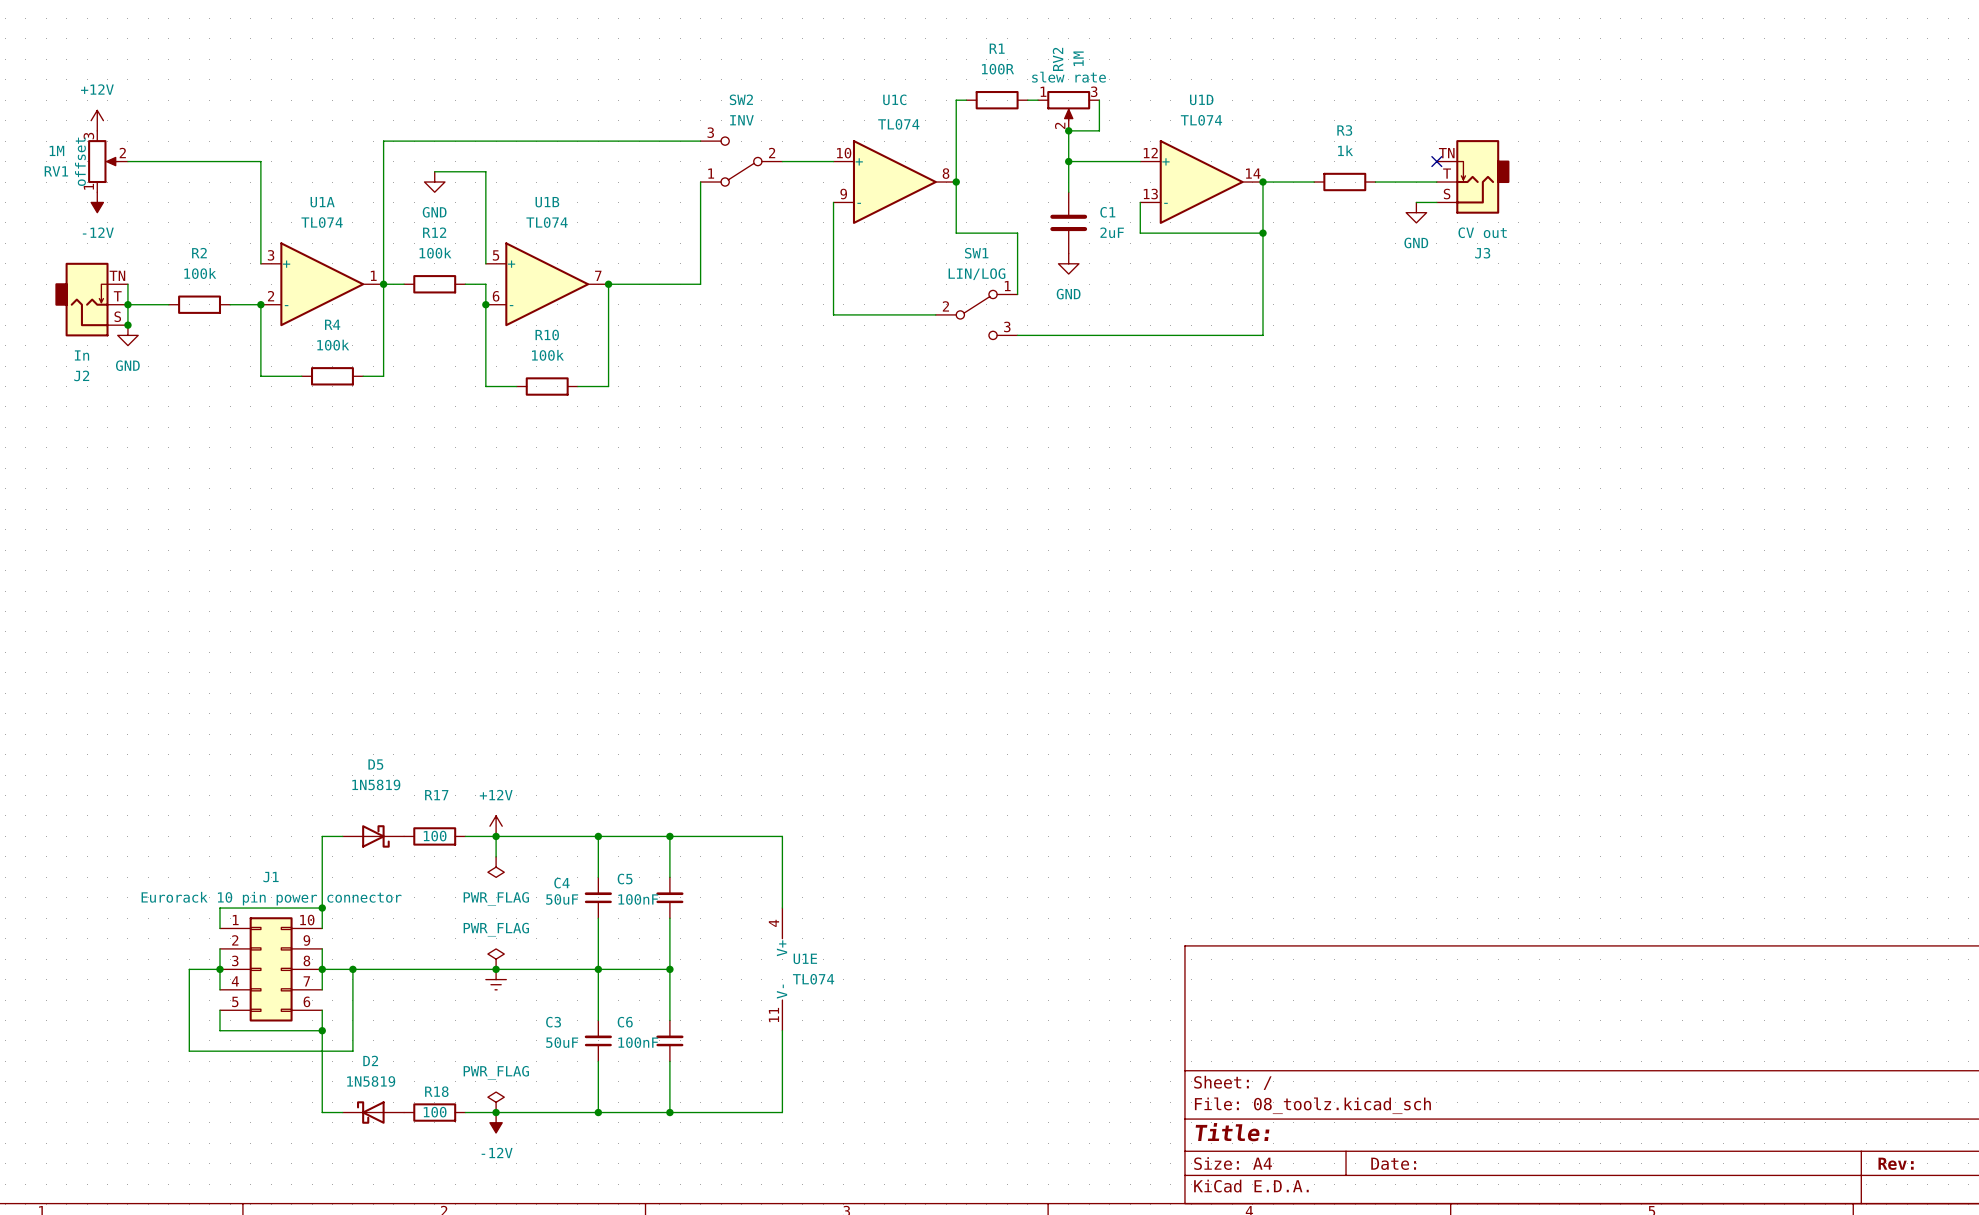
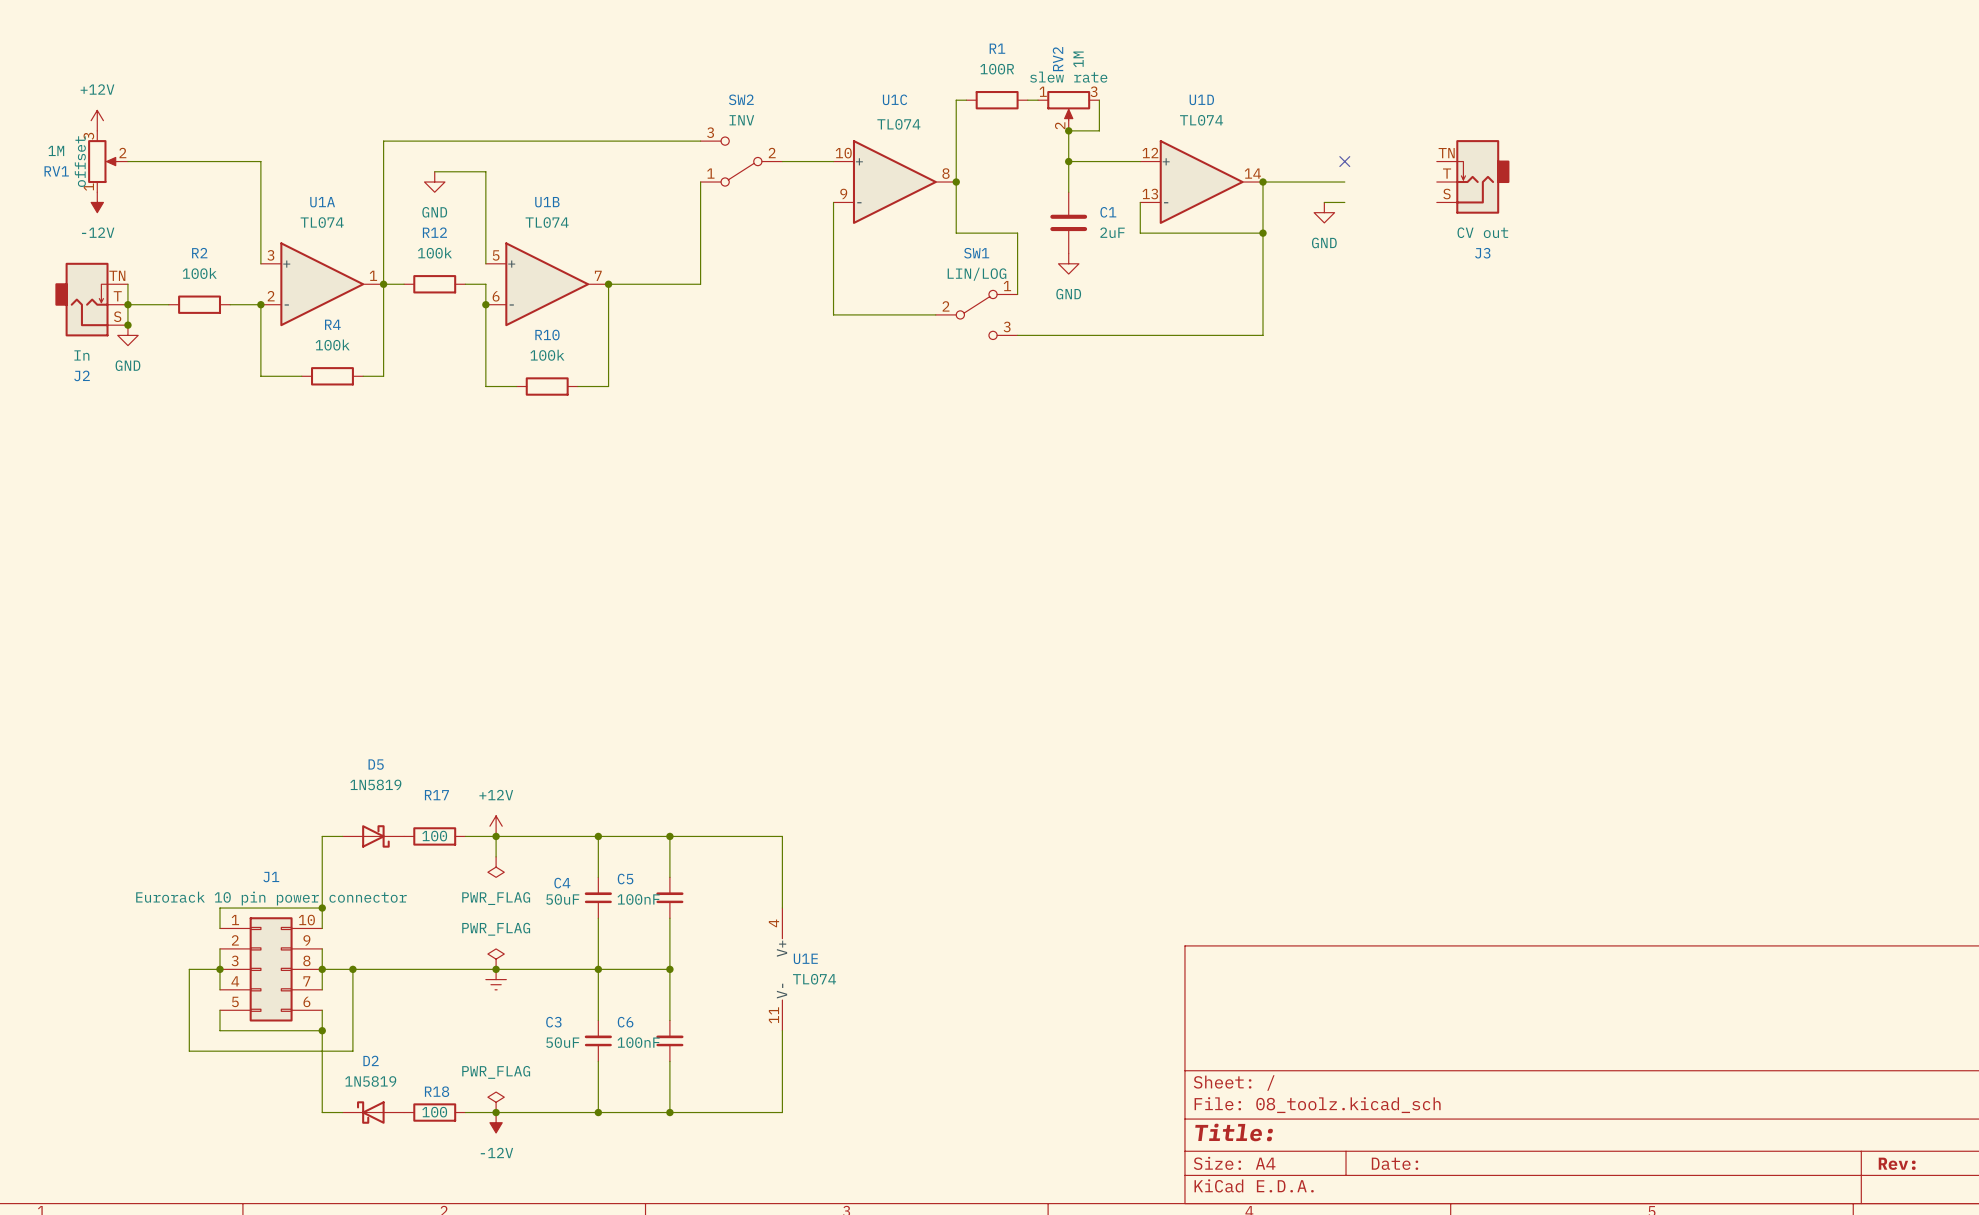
no-connect mark: none -> (1344, 161)
no-connect mark: (1436, 161) -> none
wire: none -> (1314, 182) (1344, 182)
R3: 1k (1344, 182) -> none
wire: (1375, 182) (1436, 182) -> none
wire: (1416, 202) (1436, 202) -> (1324, 202) (1344, 202)
power symbol position: GND (1416, 212) -> GND (1324, 212)

